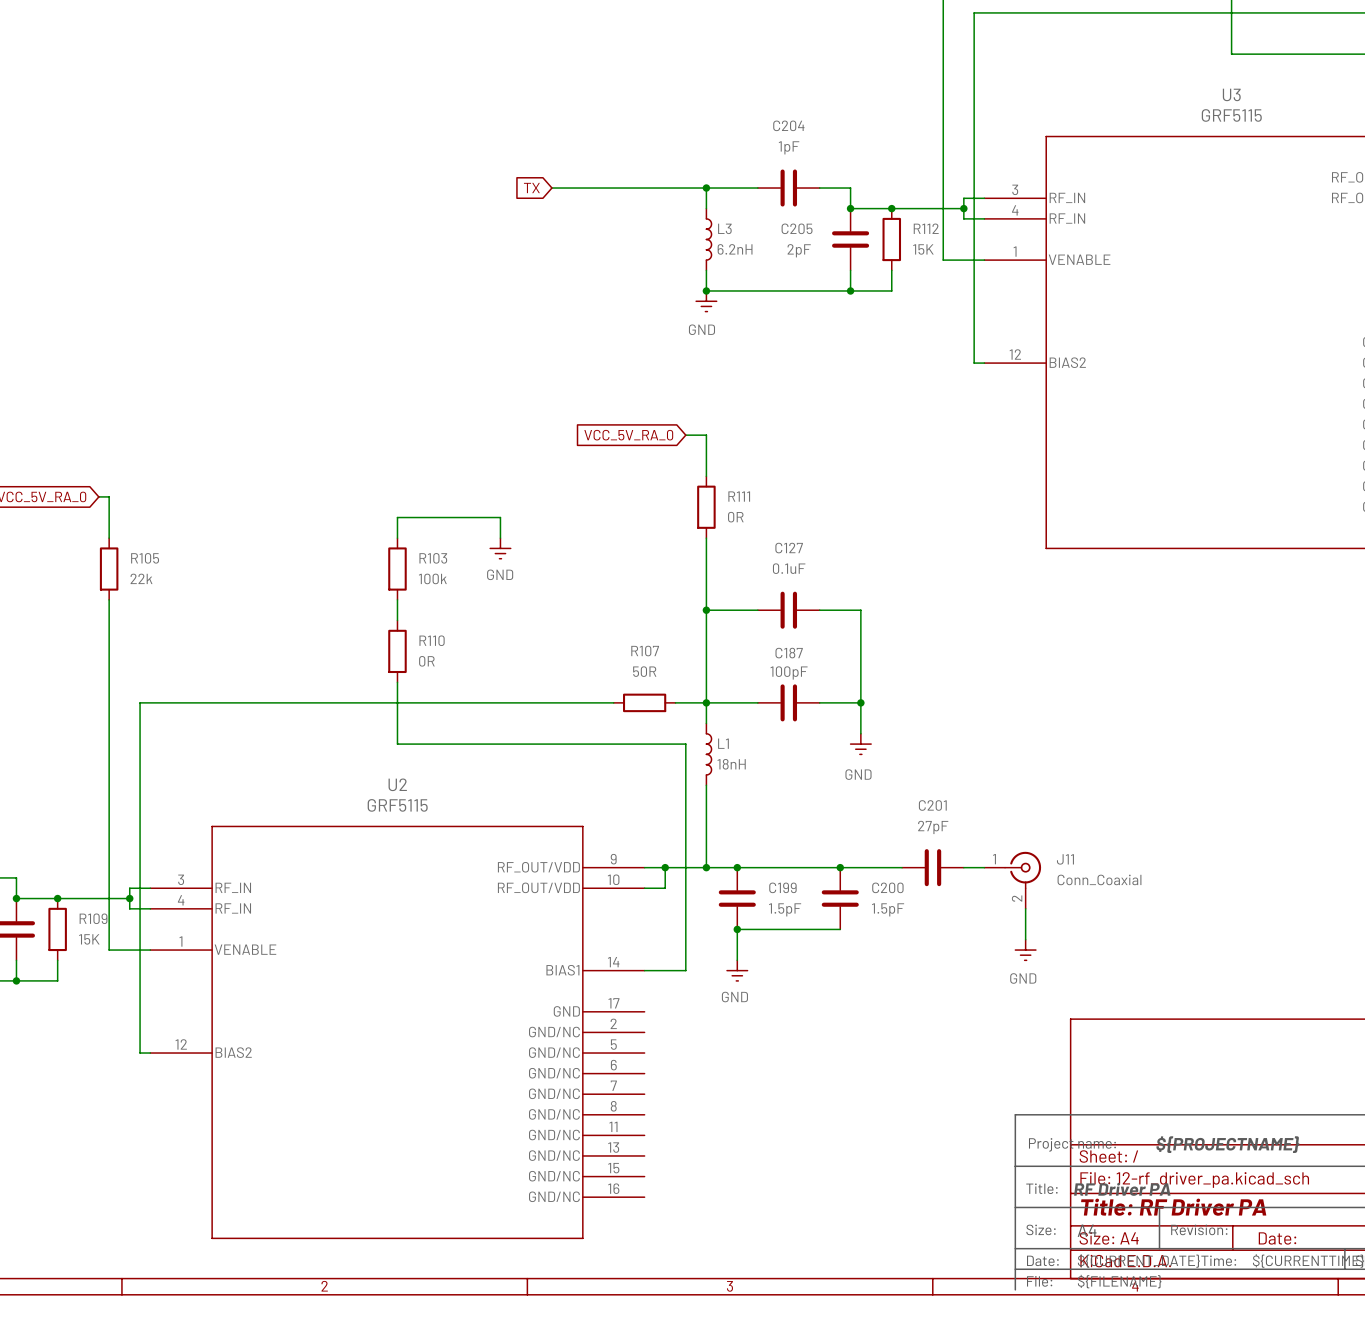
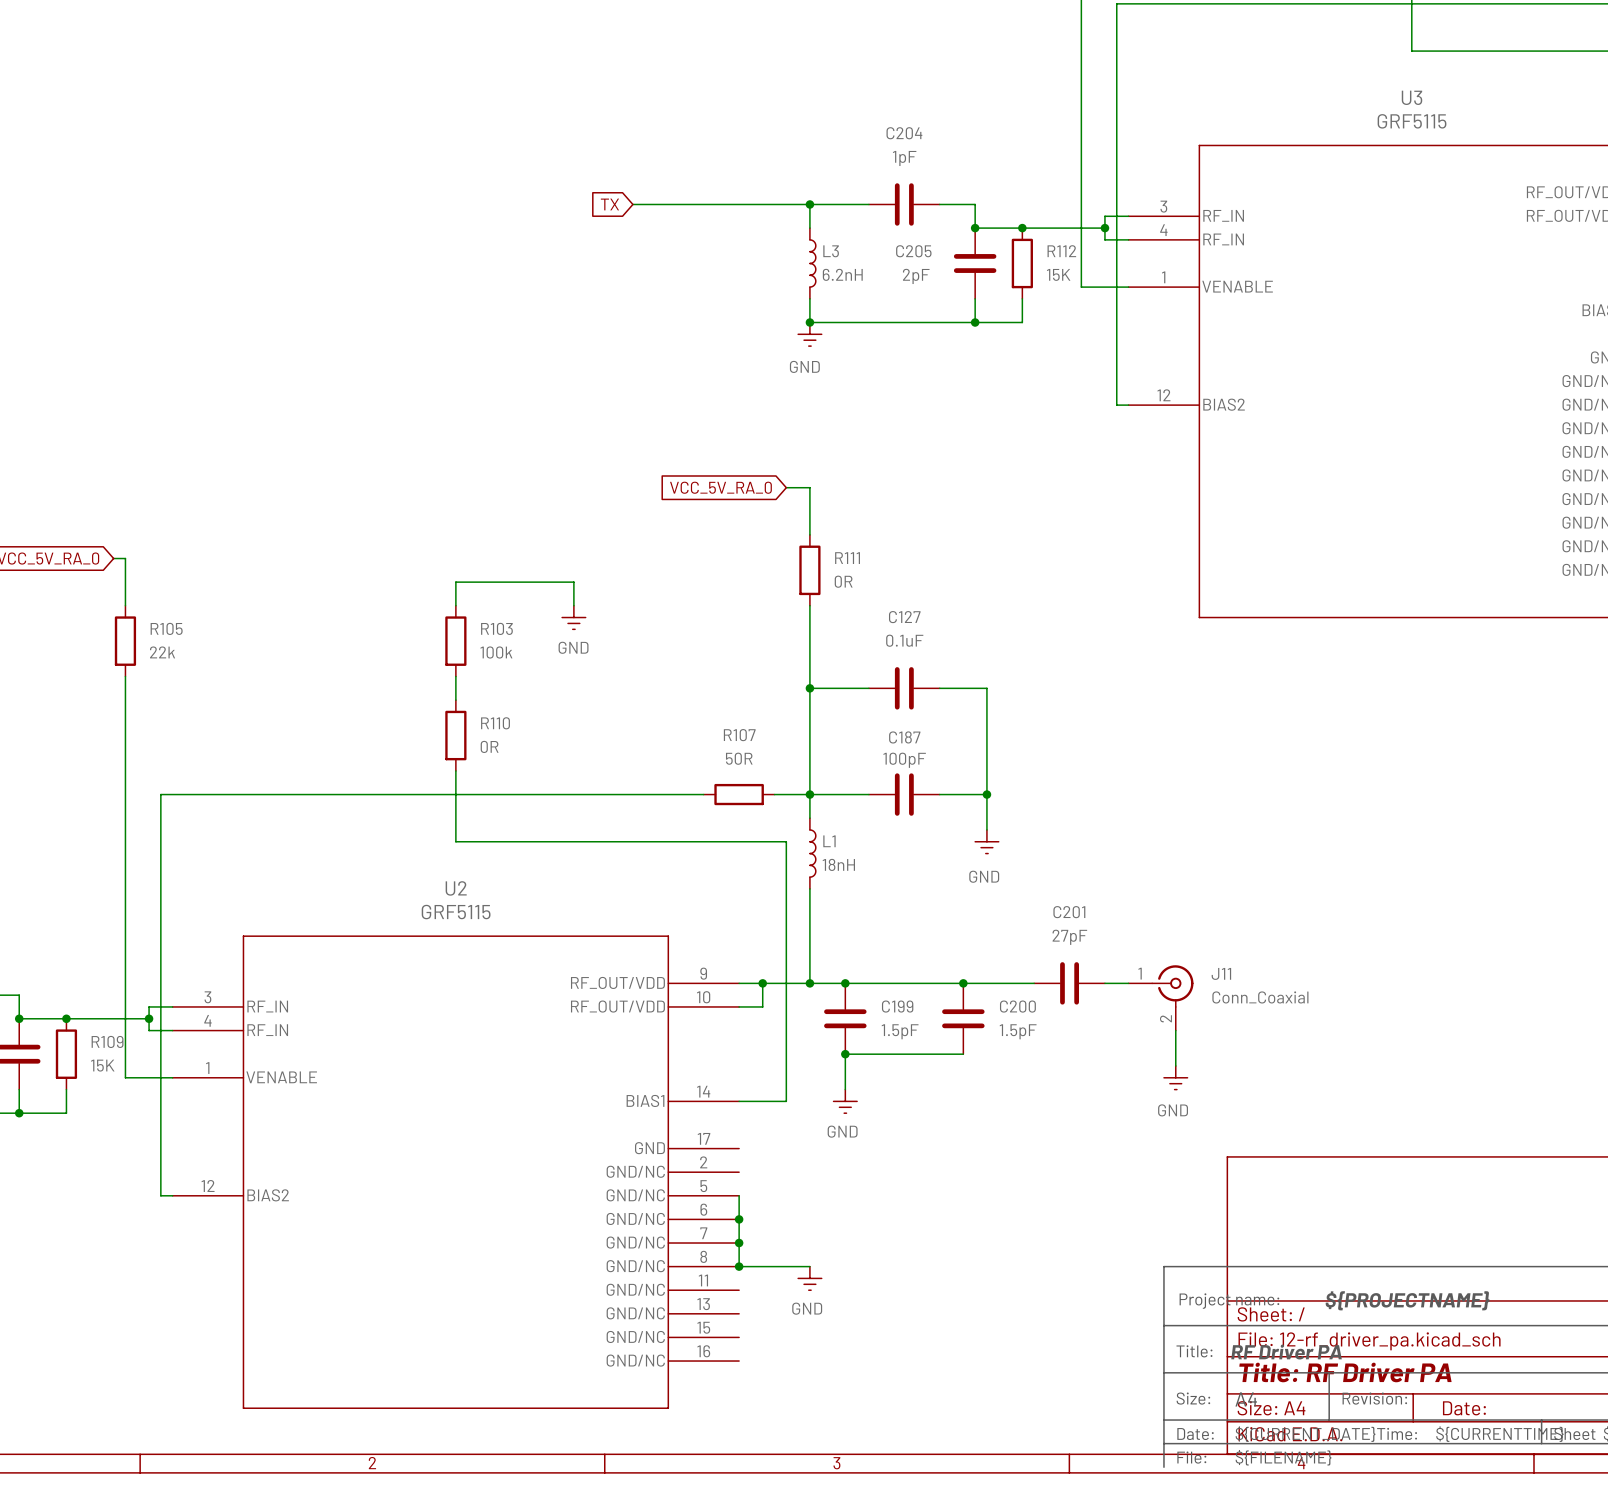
wire: none -> (739, 1195) (739, 1266) (809, 1266)
junction: none -> (739, 1219)
junction: none -> (739, 1243)
junction: none -> (739, 1266)
power symbol: none -> GND (809, 1278)

